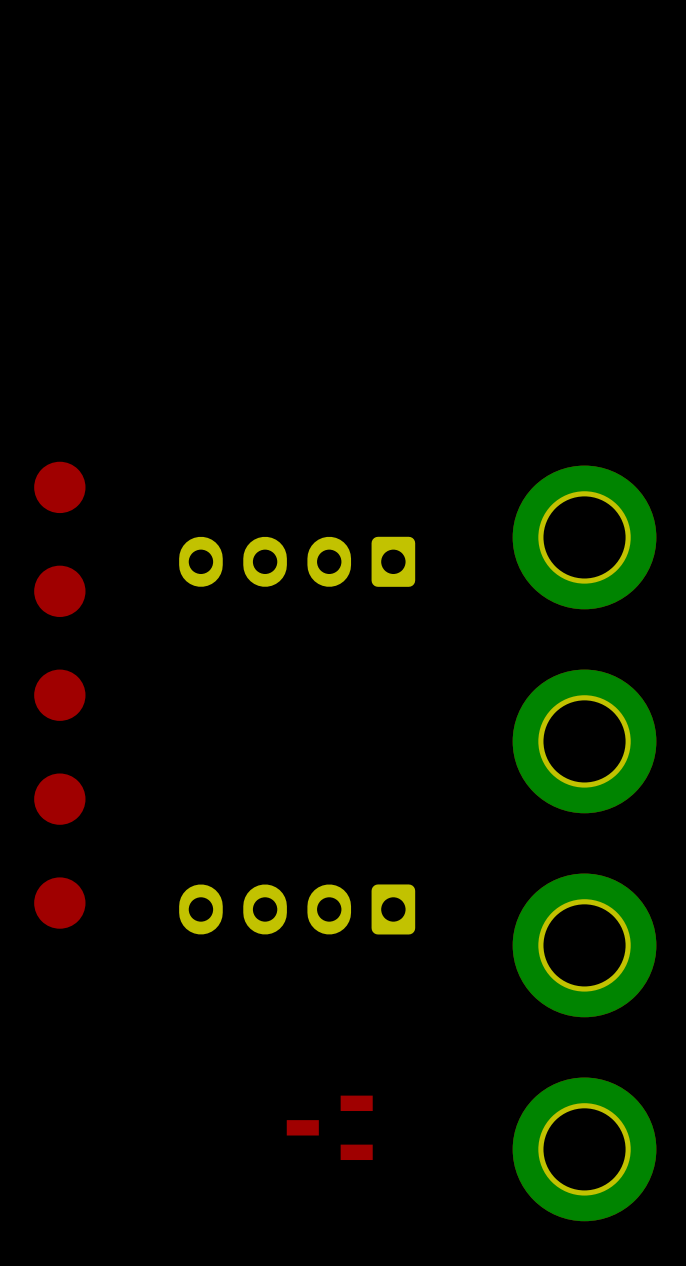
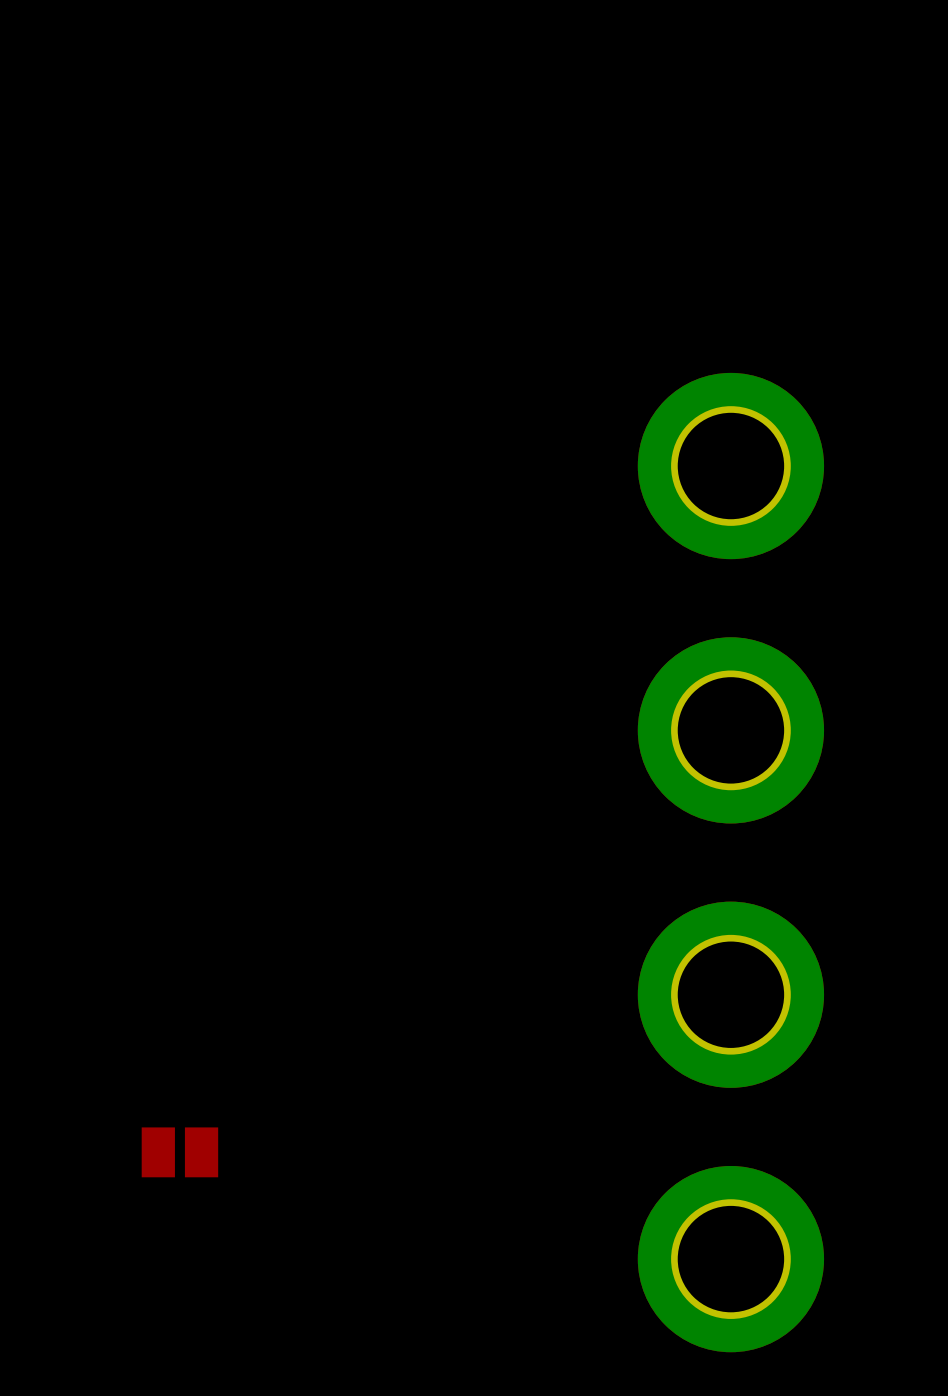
part: (59, 487) -> none
part: (297, 561) -> none
part: (59, 591) -> none
part: (59, 695) -> none
part: (59, 799) -> none
part: (59, 903) -> none
part: (297, 909) -> none
part: none -> (179, 1152)
part: (329, 1127) -> none

